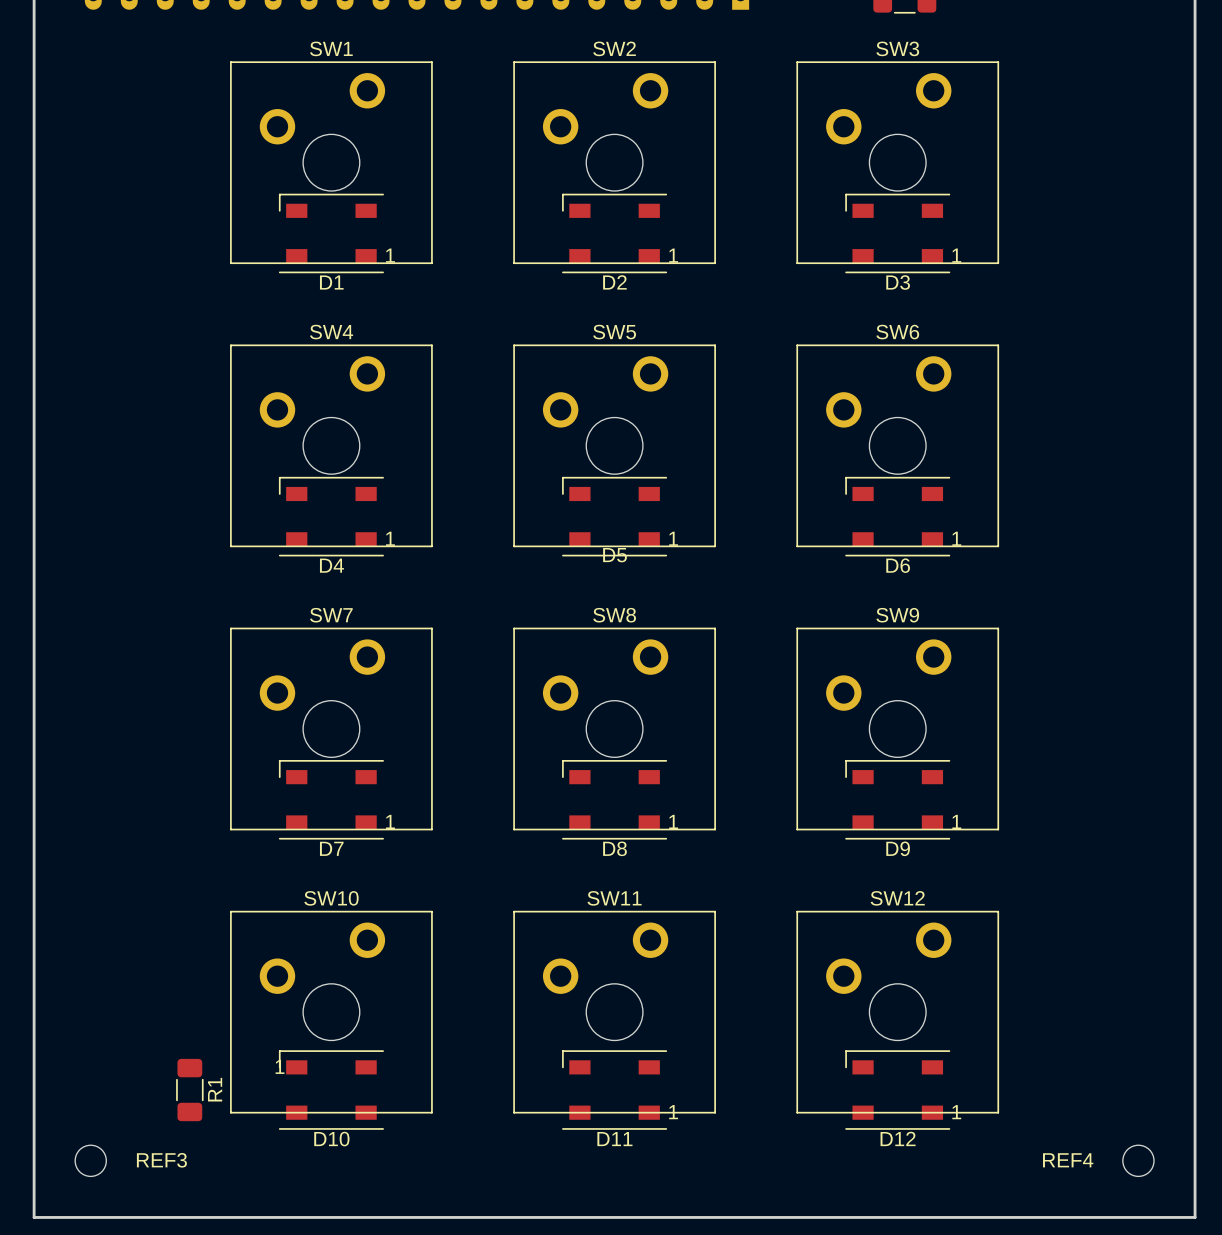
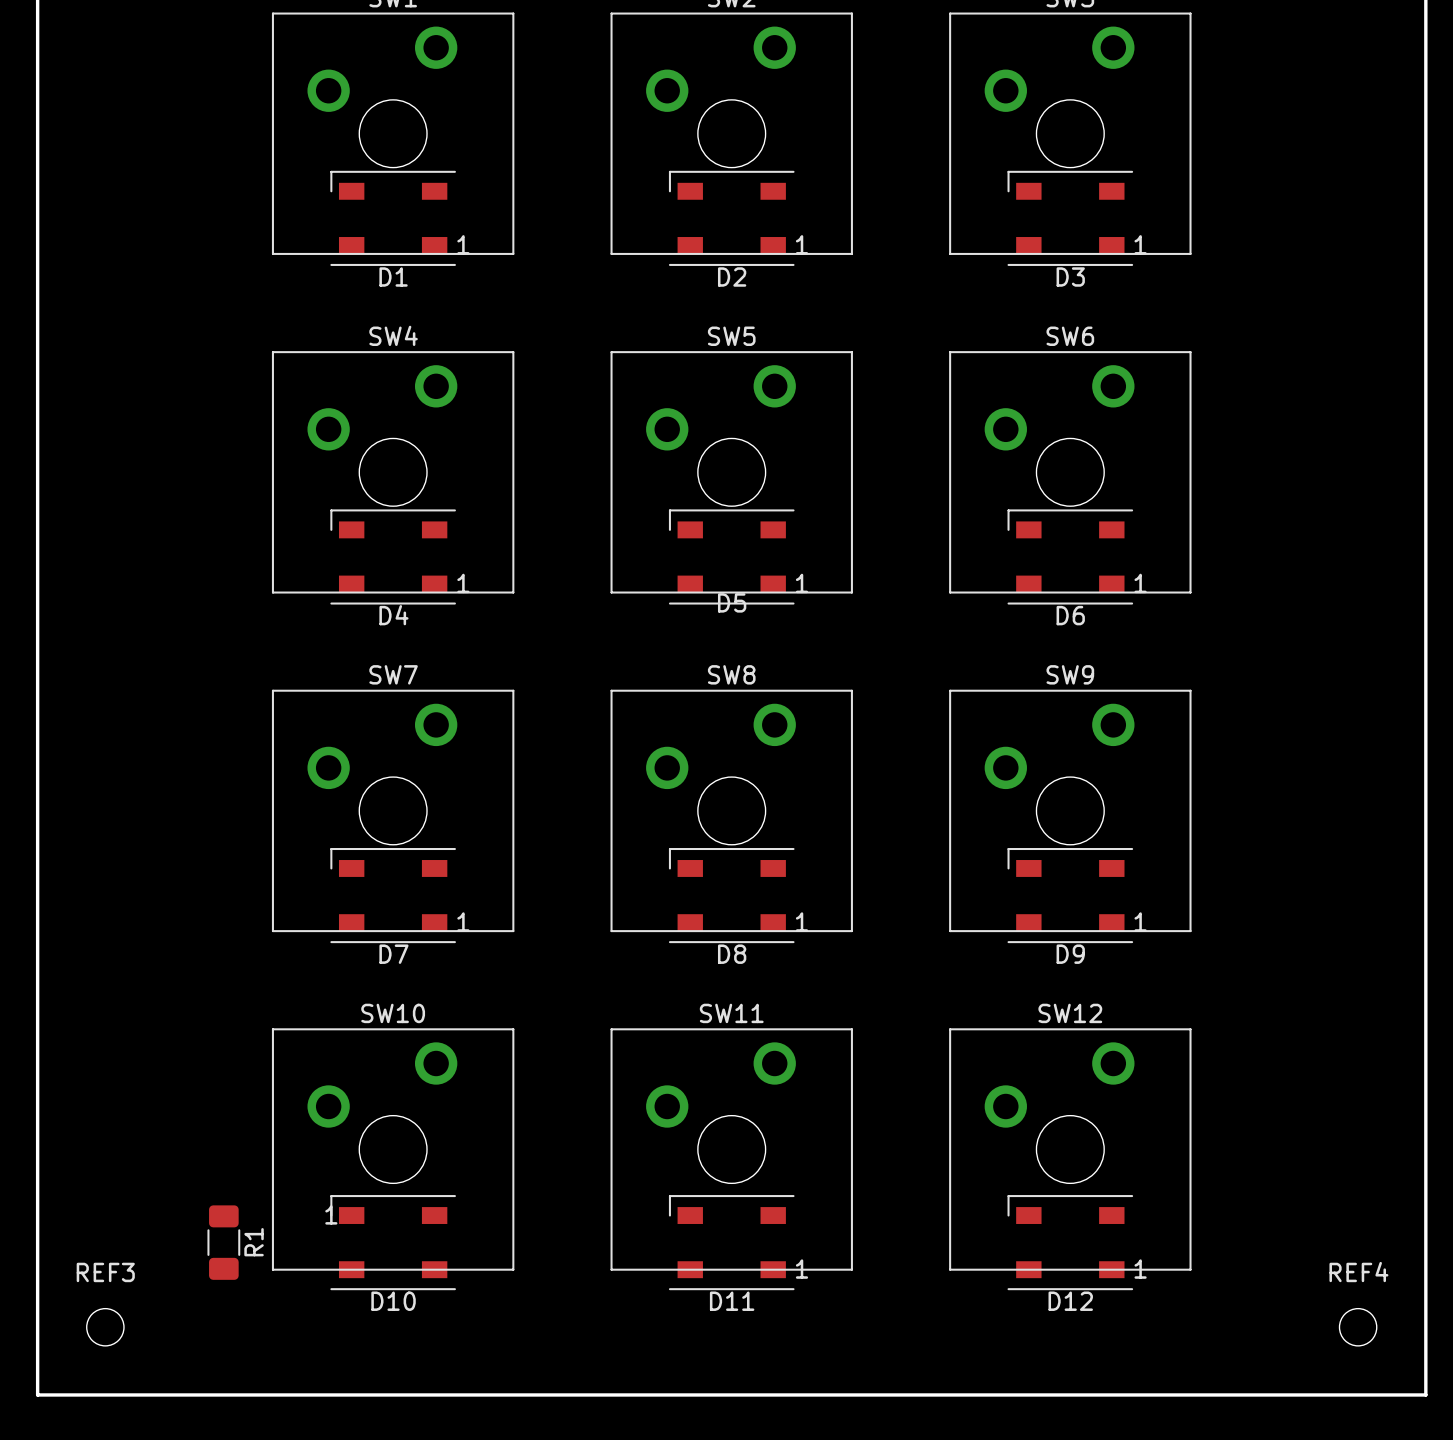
REF3 name position: REF3 (161, 1160) -> REF3 (105, 1272)
REF4 name position: REF4 (1068, 1160) -> REF4 (1358, 1272)

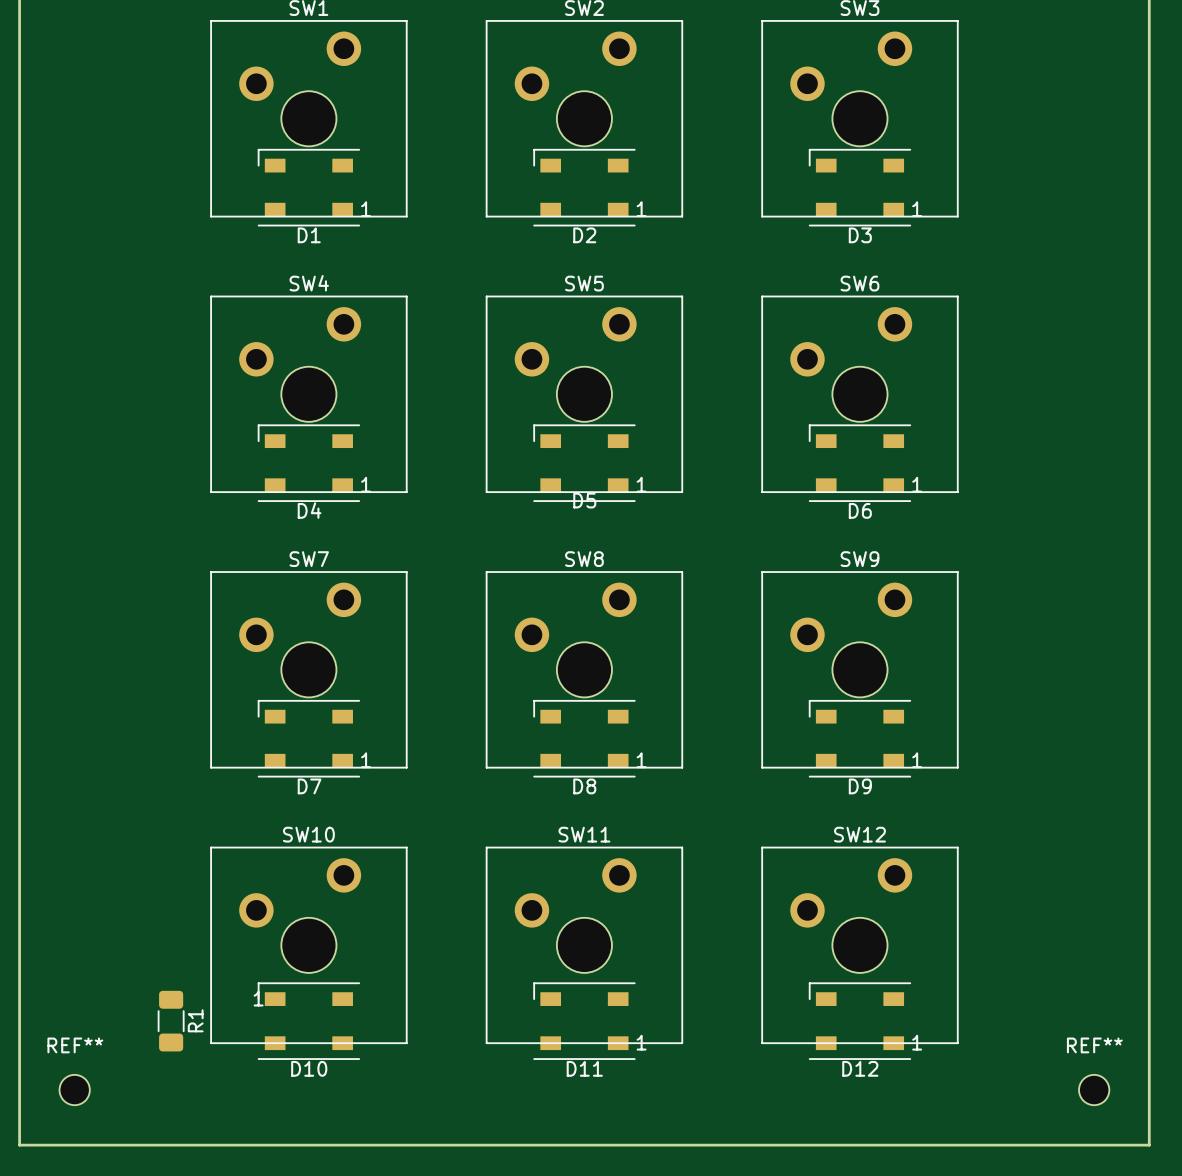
REF3 name: REF3 (105, 1272) -> REF** (75, 1045)
REF4 name: REF4 (1358, 1272) -> REF** (1094, 1045)

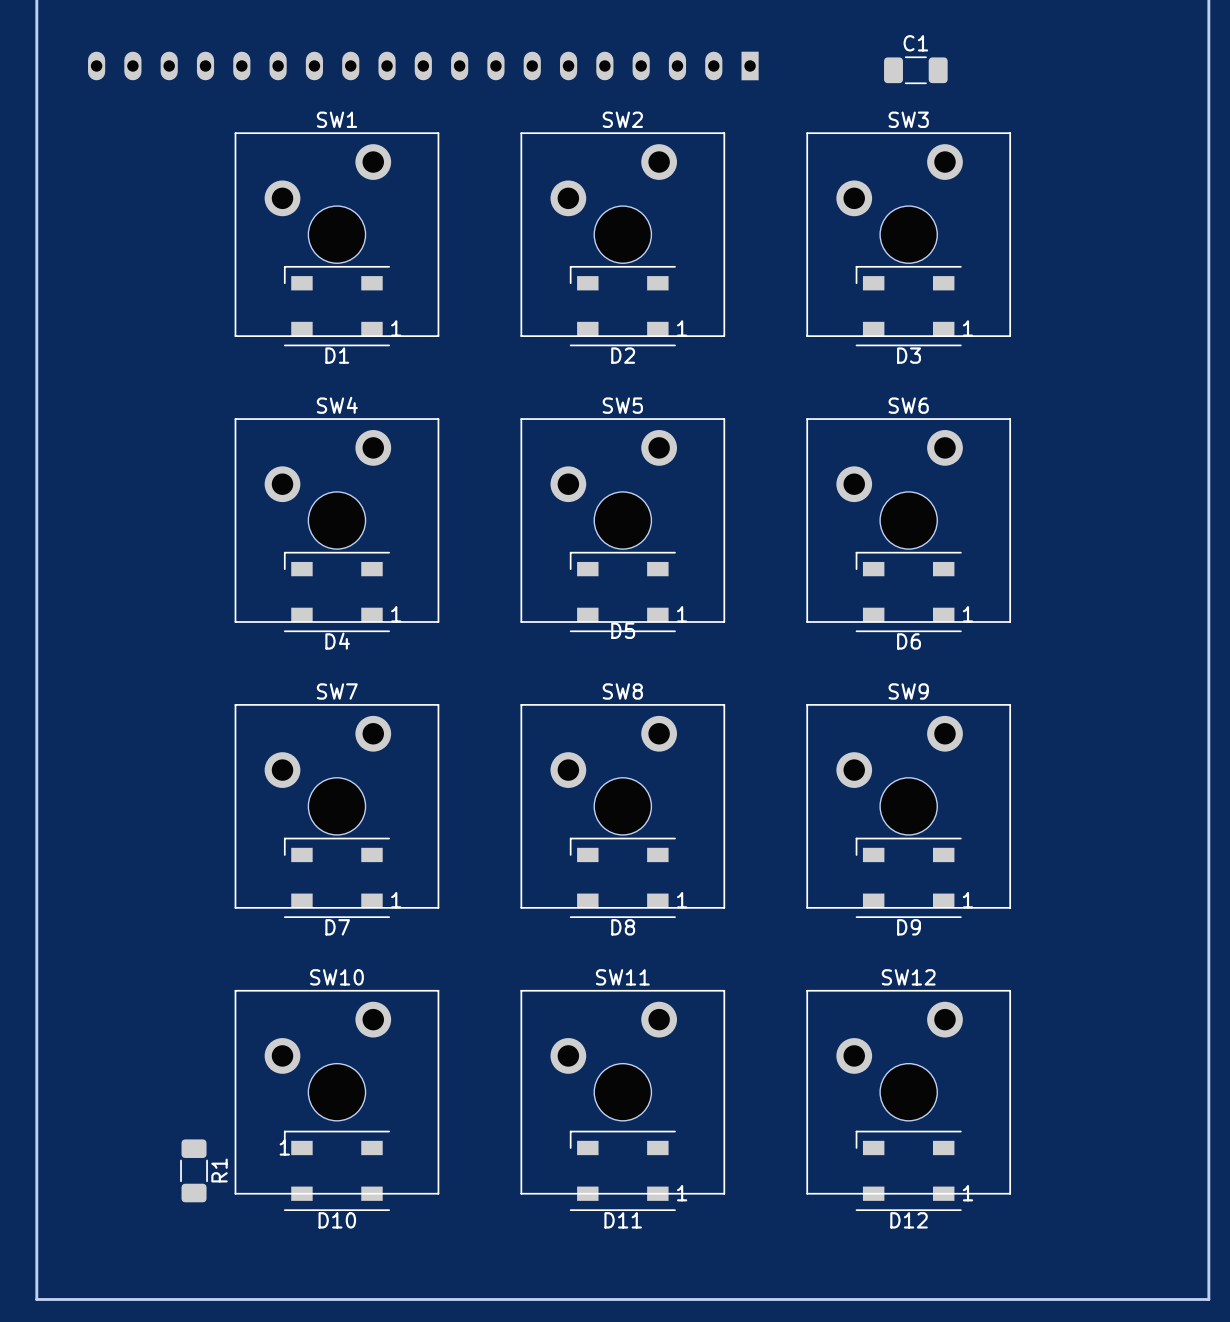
REF**: (74, 1090) -> none
REF**: (1094, 1090) -> none

